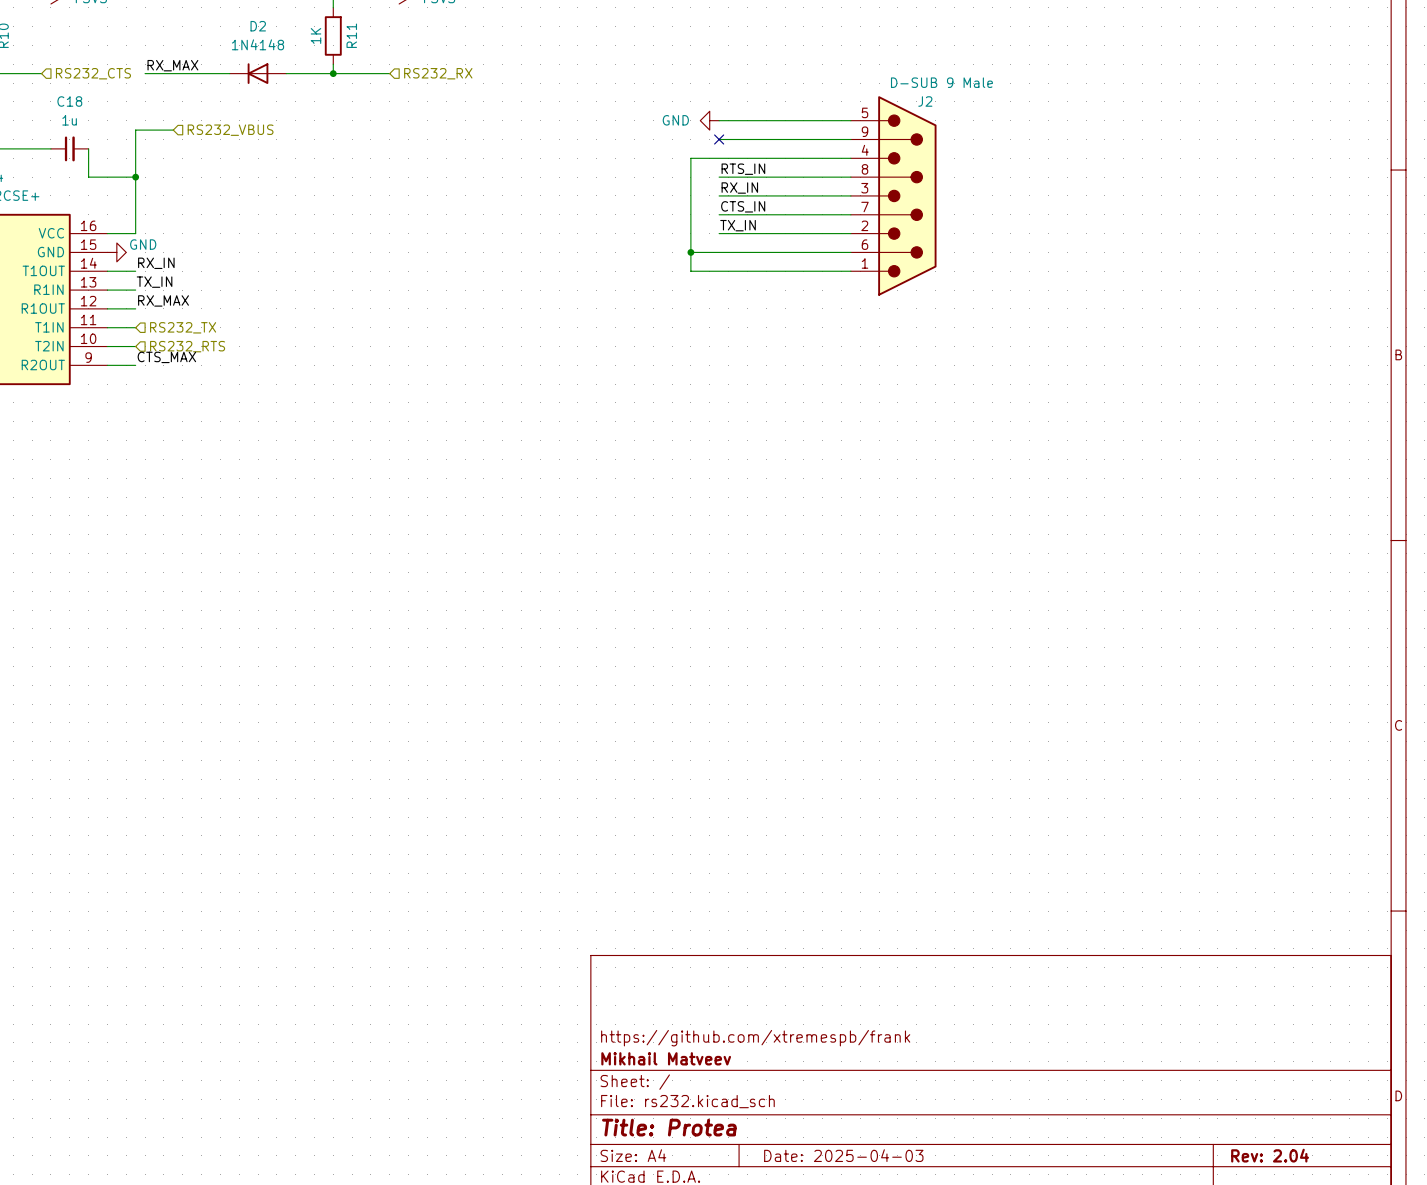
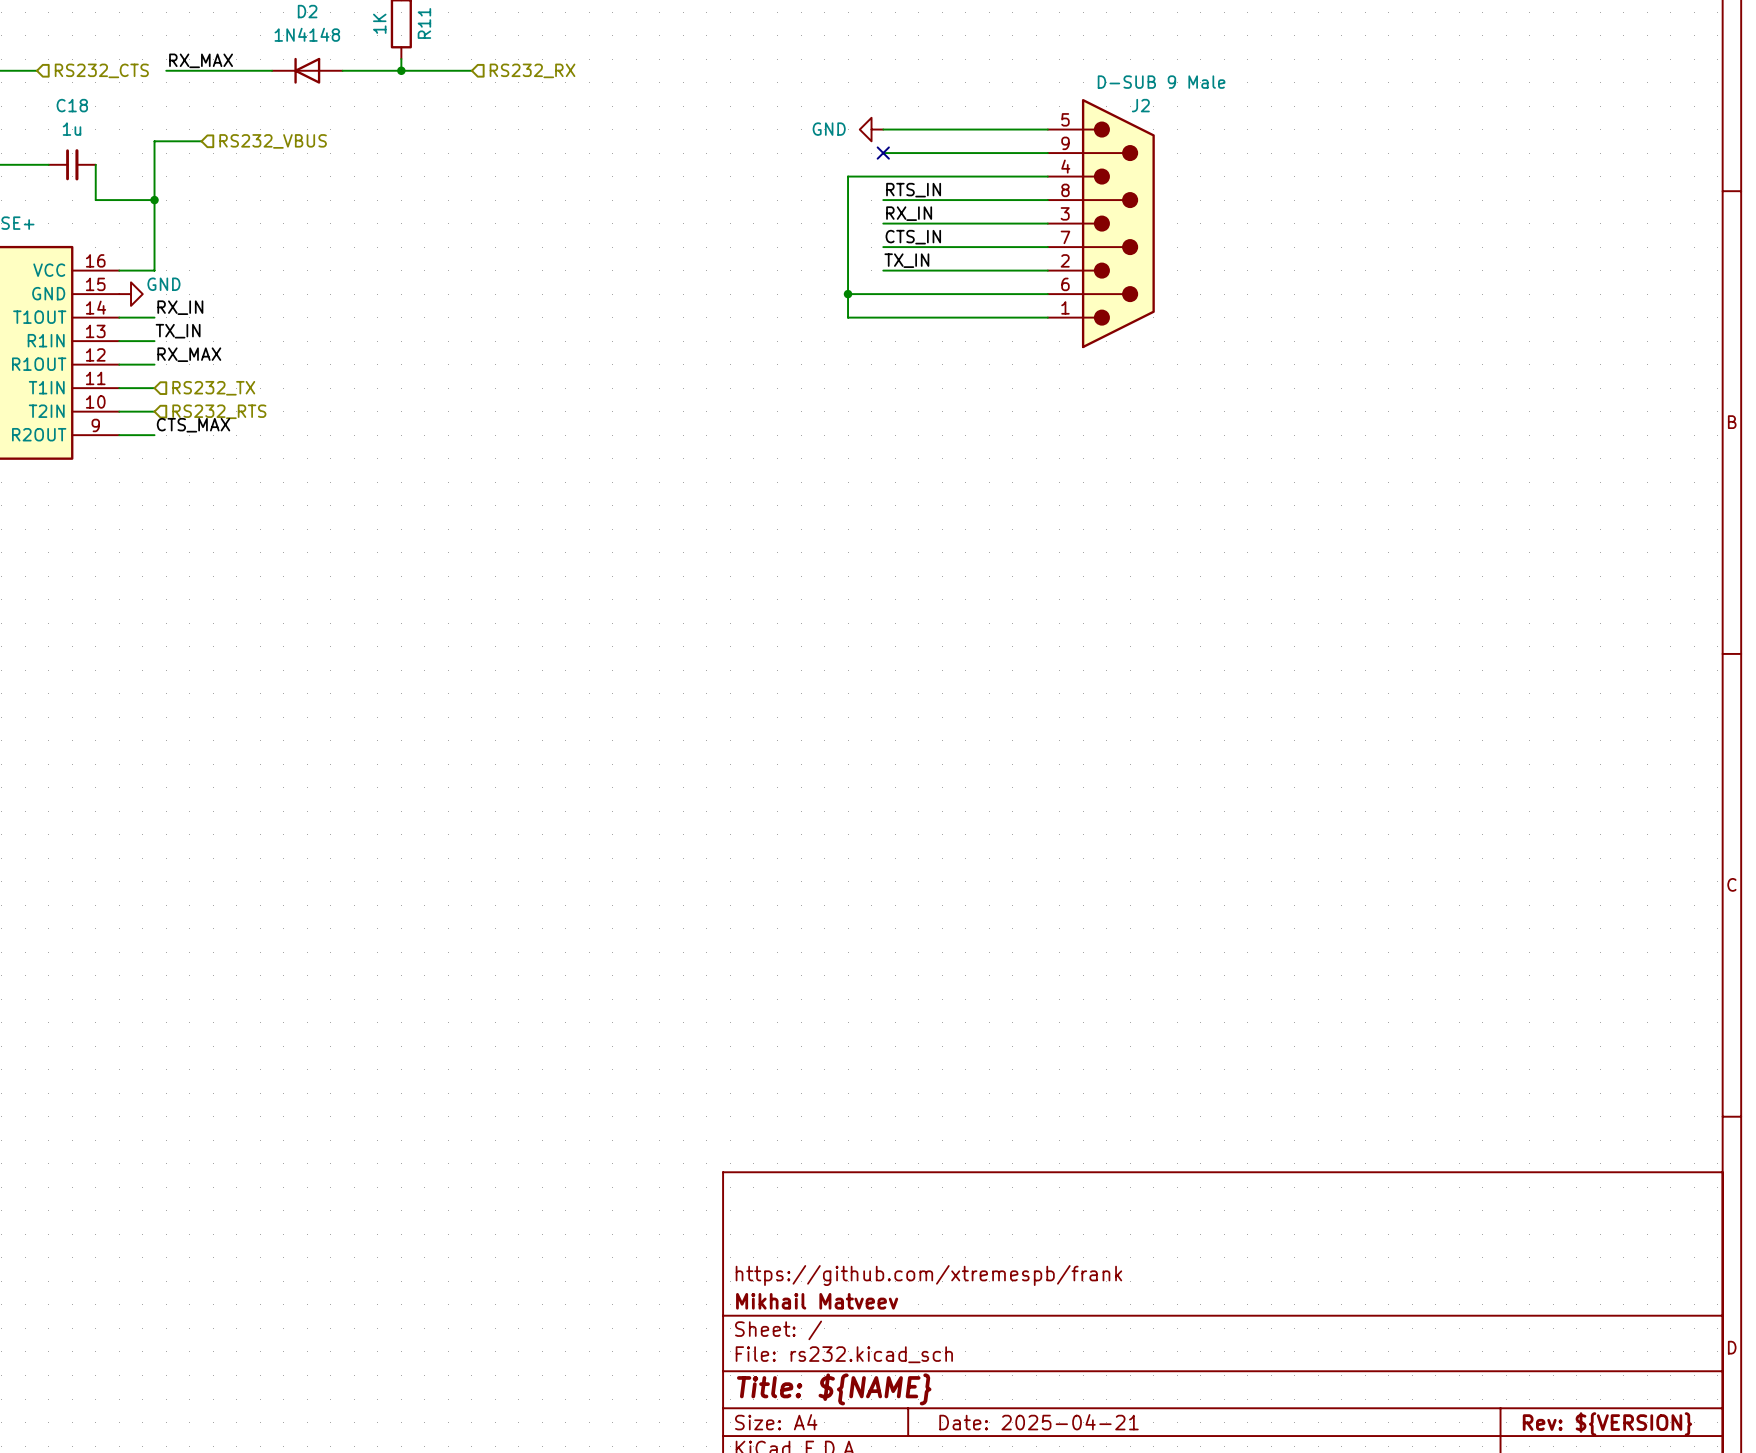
title block: Title: Protea (669, 1127) -> Title: ${NAME} (834, 1389)
title block: Date: 2025-04-03 (843, 1155) -> Date: 2025-04-21 (1039, 1422)
title block: Rev: 2.04 (1270, 1155) -> Rev: ${VERSION} (1607, 1424)

